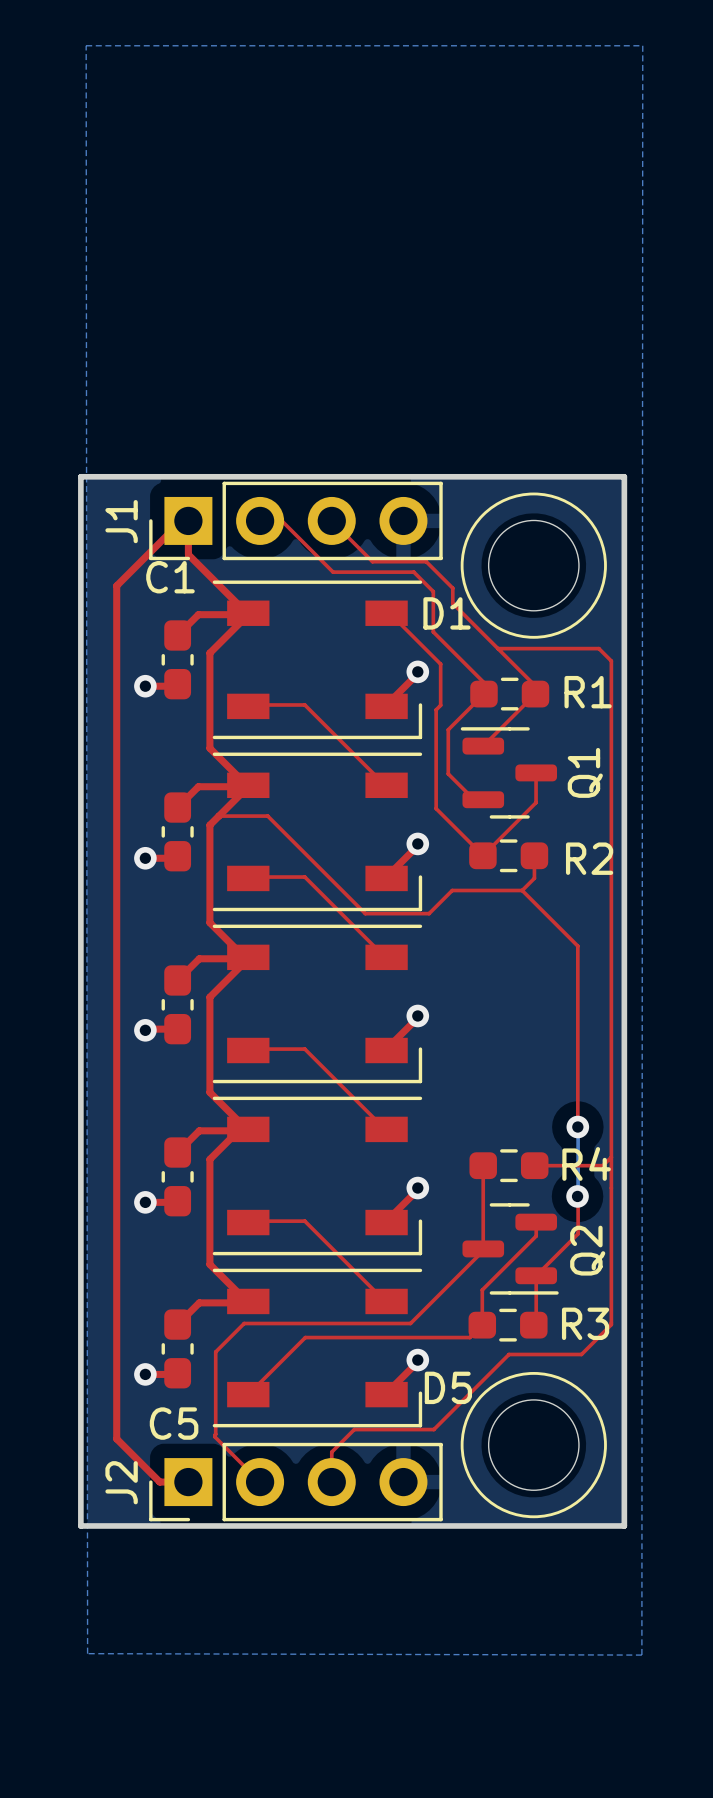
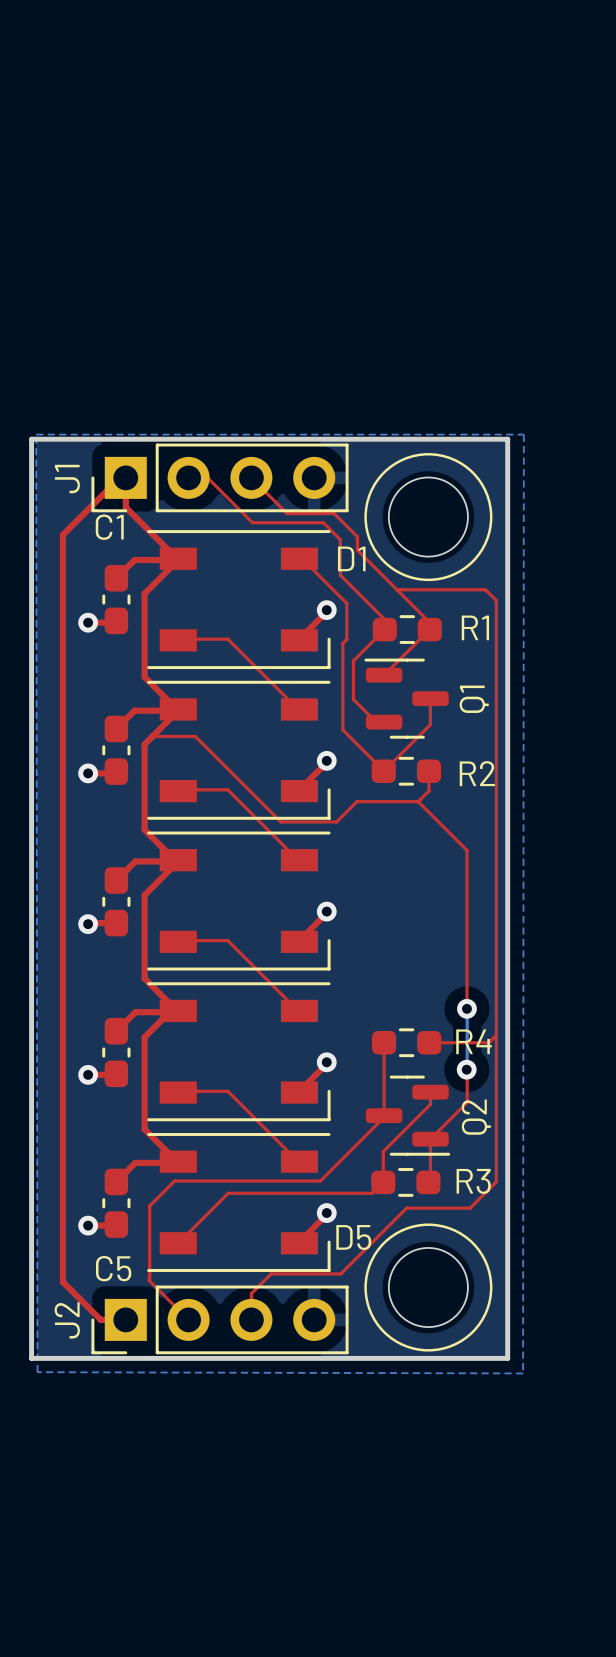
bottom zone outline: (86, 45) (87, 1653) (641, 1655) (642, 45) (86, 45) -> (36, 434) (37, 1372) (523, 1373) (523, 434) (36, 434)

